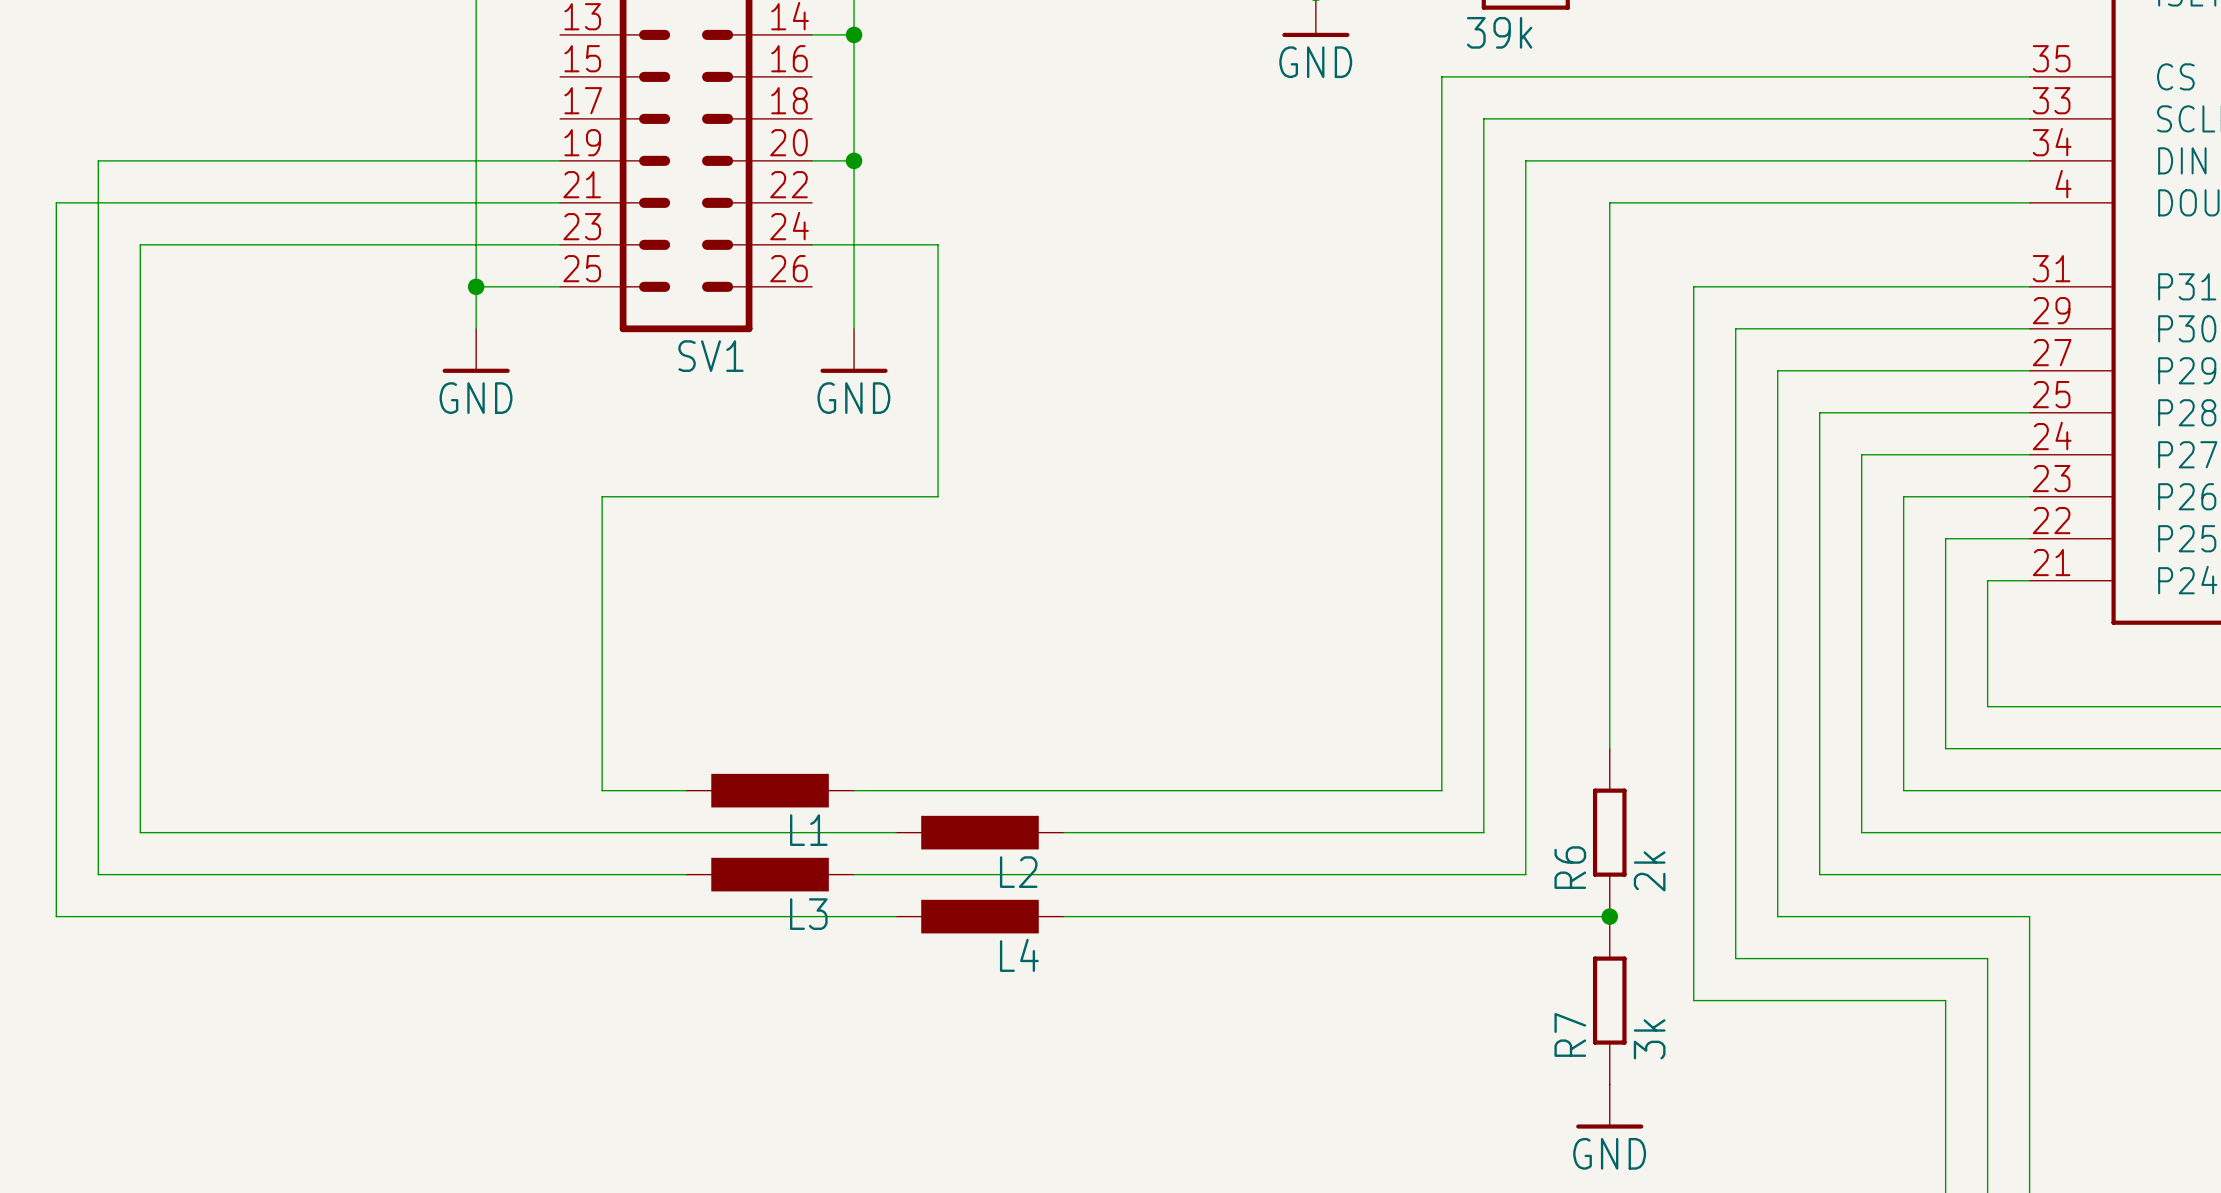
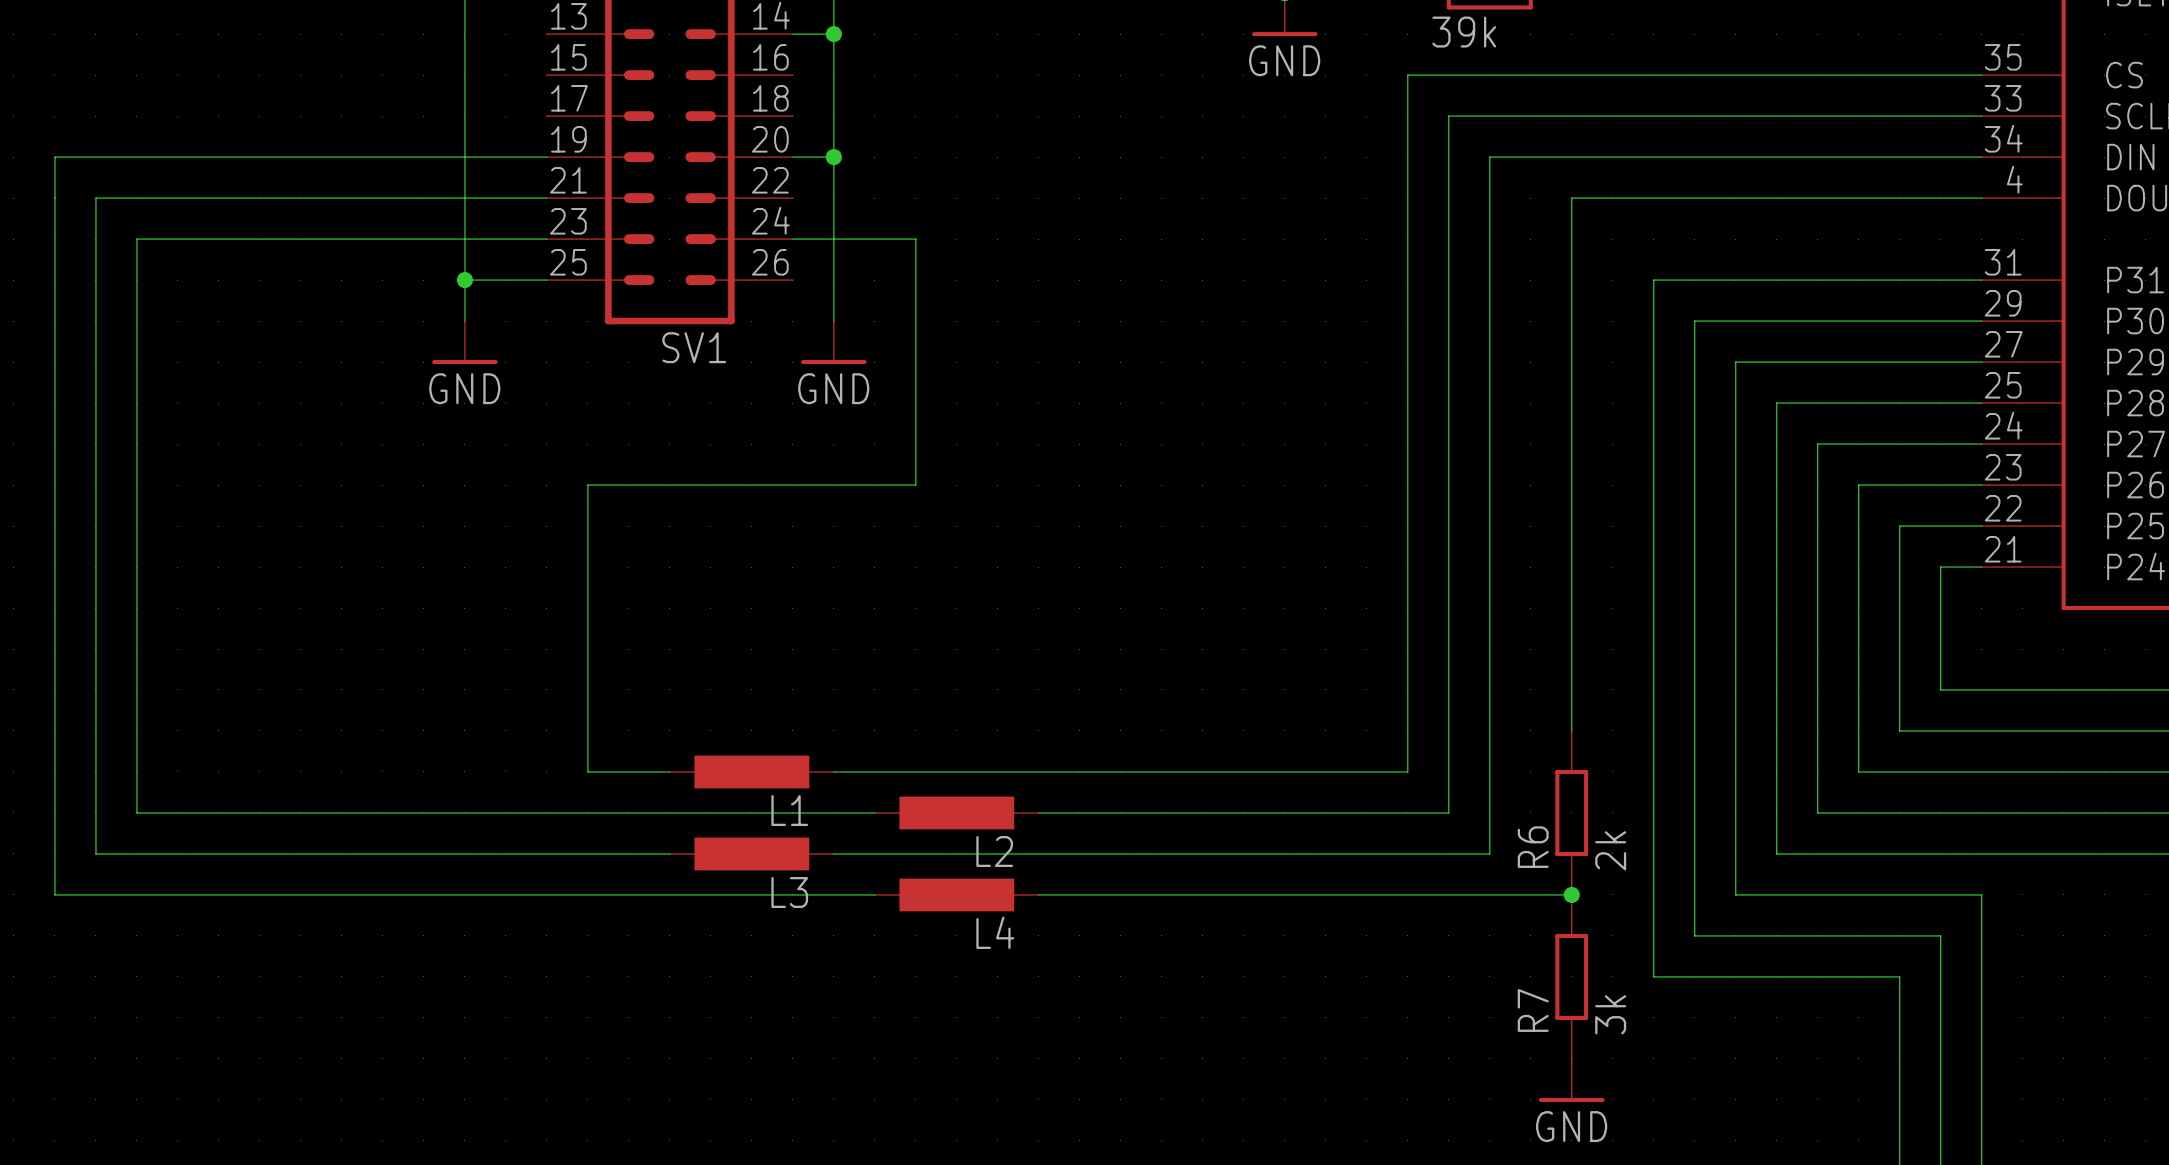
wire: (98, 160) (98, 202) (56, 202) -> (95, 157) (54, 157) (54, 198)

